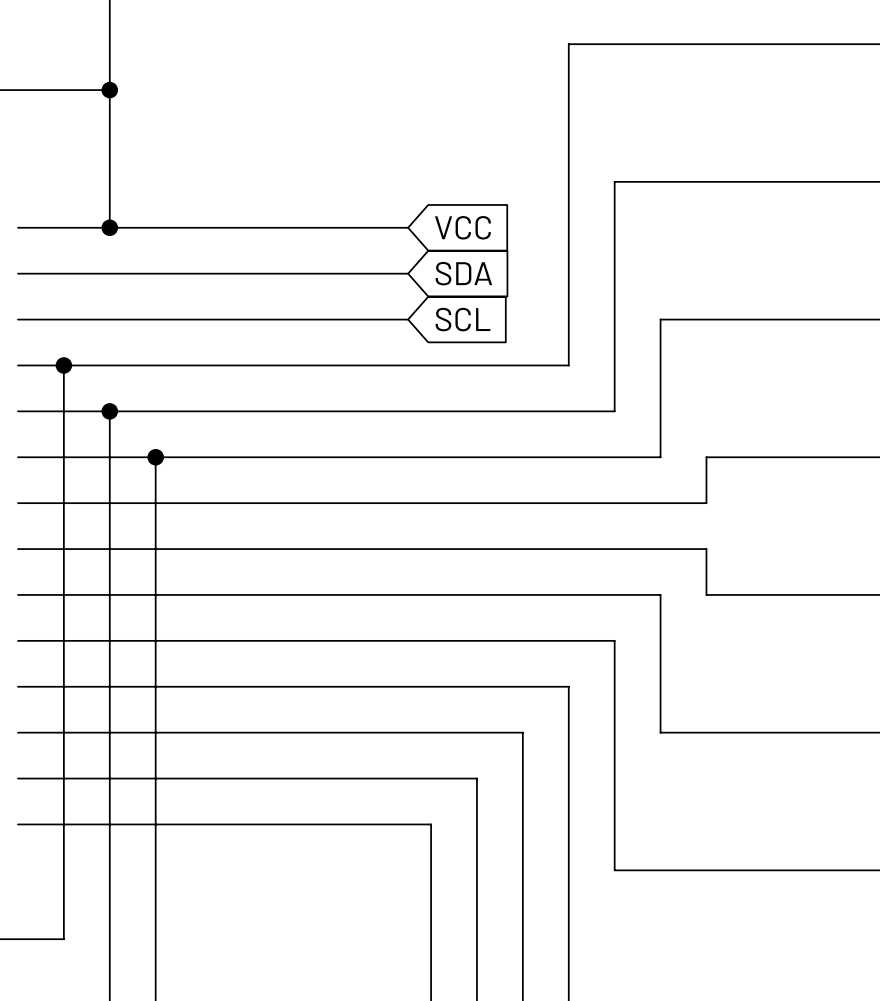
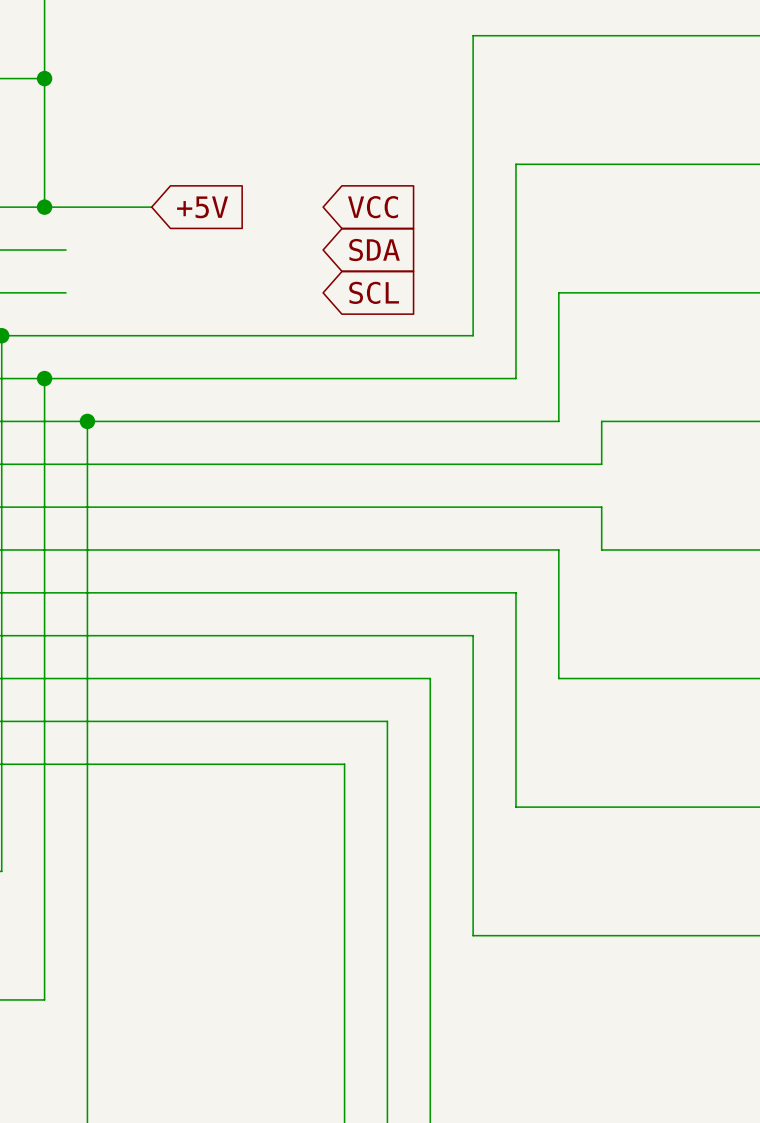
wire: (224, 227) (408, 227) -> none
global label: none -> +5V (202, 207)
wire: (132, 273) (408, 273) -> none
wire: (132, 319) (408, 319) -> none

